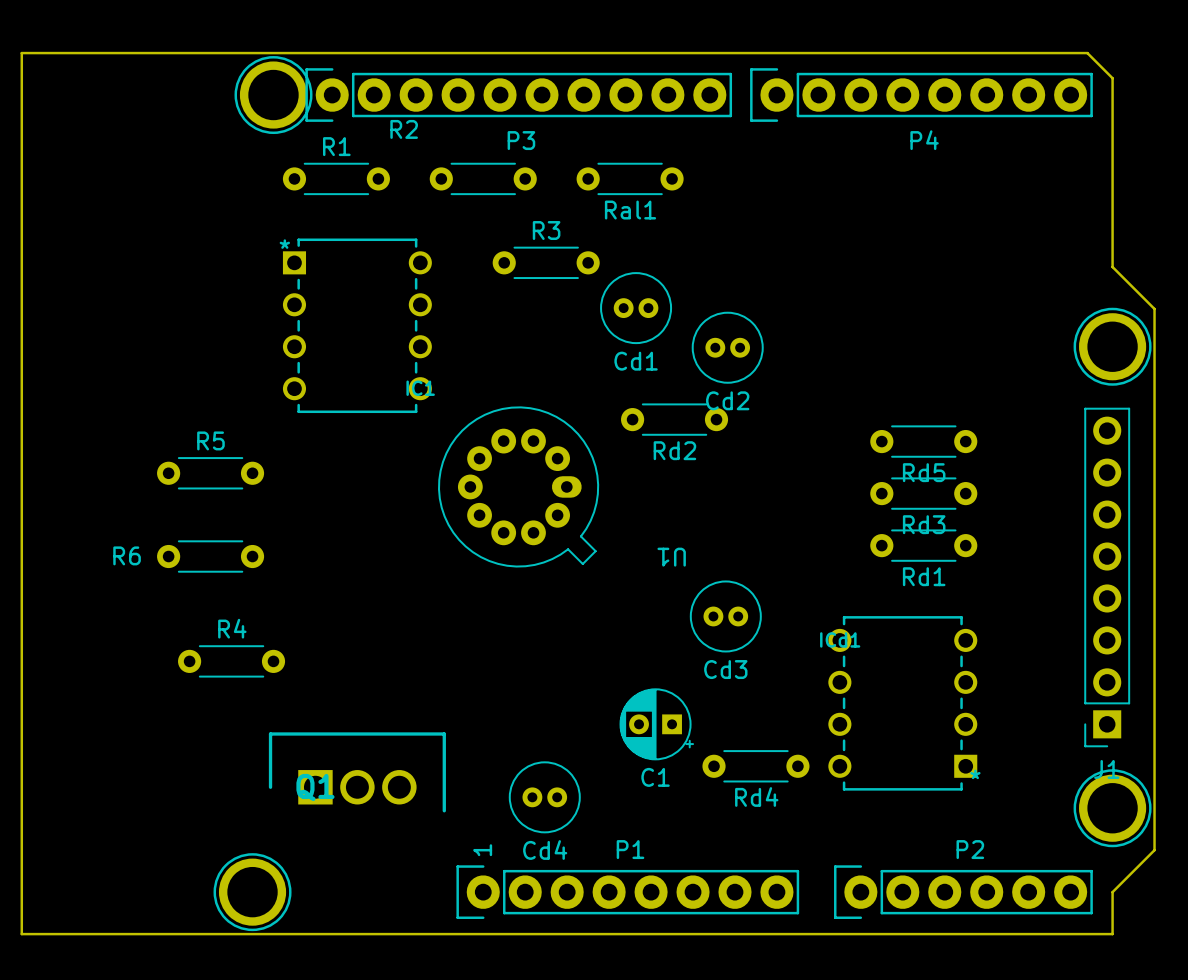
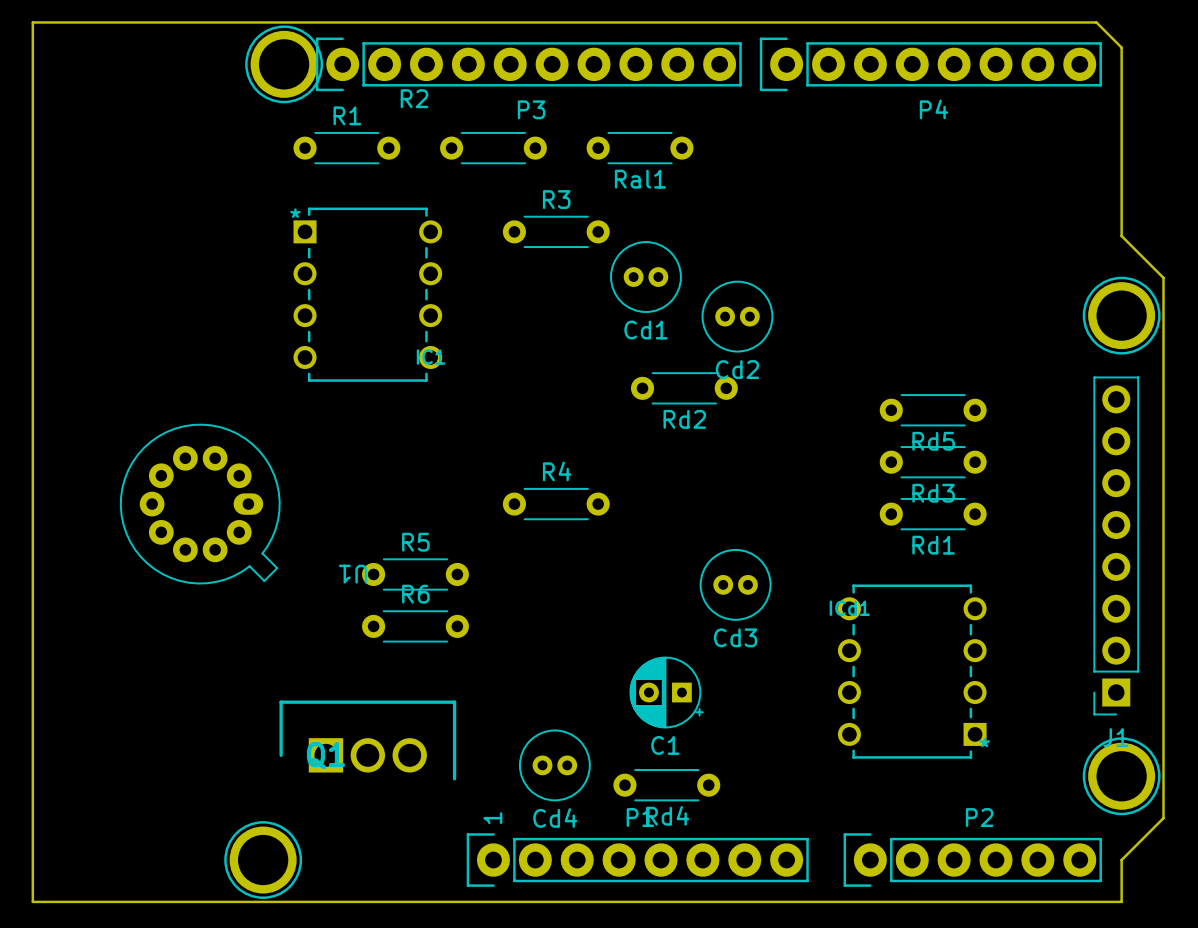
U1 footprint: [438, 406, 600, 568] -> [119, 423, 281, 585]
R5 position: (210, 473) -> (415, 574)
R6 name position: R6 (127, 555) -> R6 (415, 594)
R6 position: (210, 556) -> (415, 626)
R4 position: (231, 661) -> (556, 504)
Rd4 position: (755, 766) -> (666, 785)

